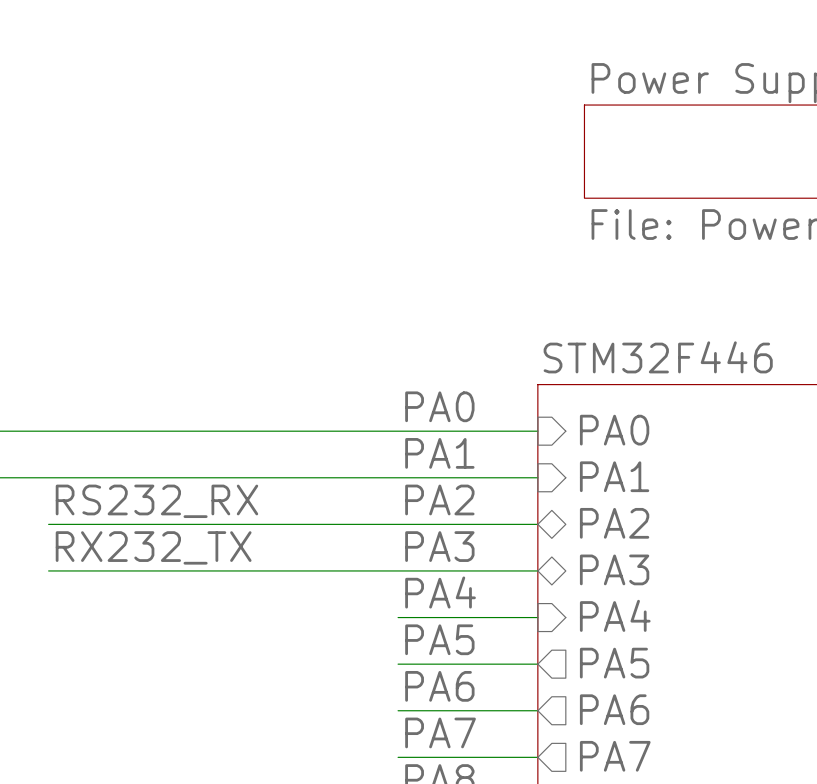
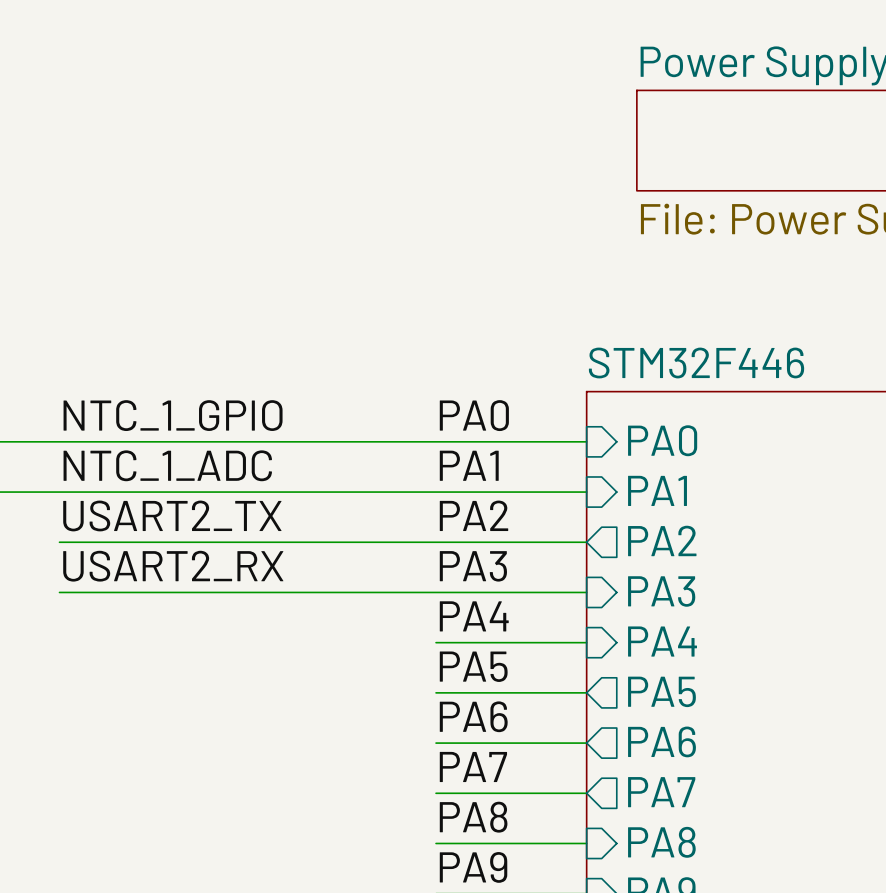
label: none -> NTC_1_GPIO (173, 415)
label: none -> NTC_1_ADC (167, 465)
label: RS232_RX (156, 501) -> USART2_TX (172, 515)
sheet pin shape: bidirectional (614, 523) -> output (662, 540)
label: RX232_TX (153, 547) -> USART2_RX (173, 566)
sheet pin shape: bidirectional (614, 569) -> input (661, 591)

